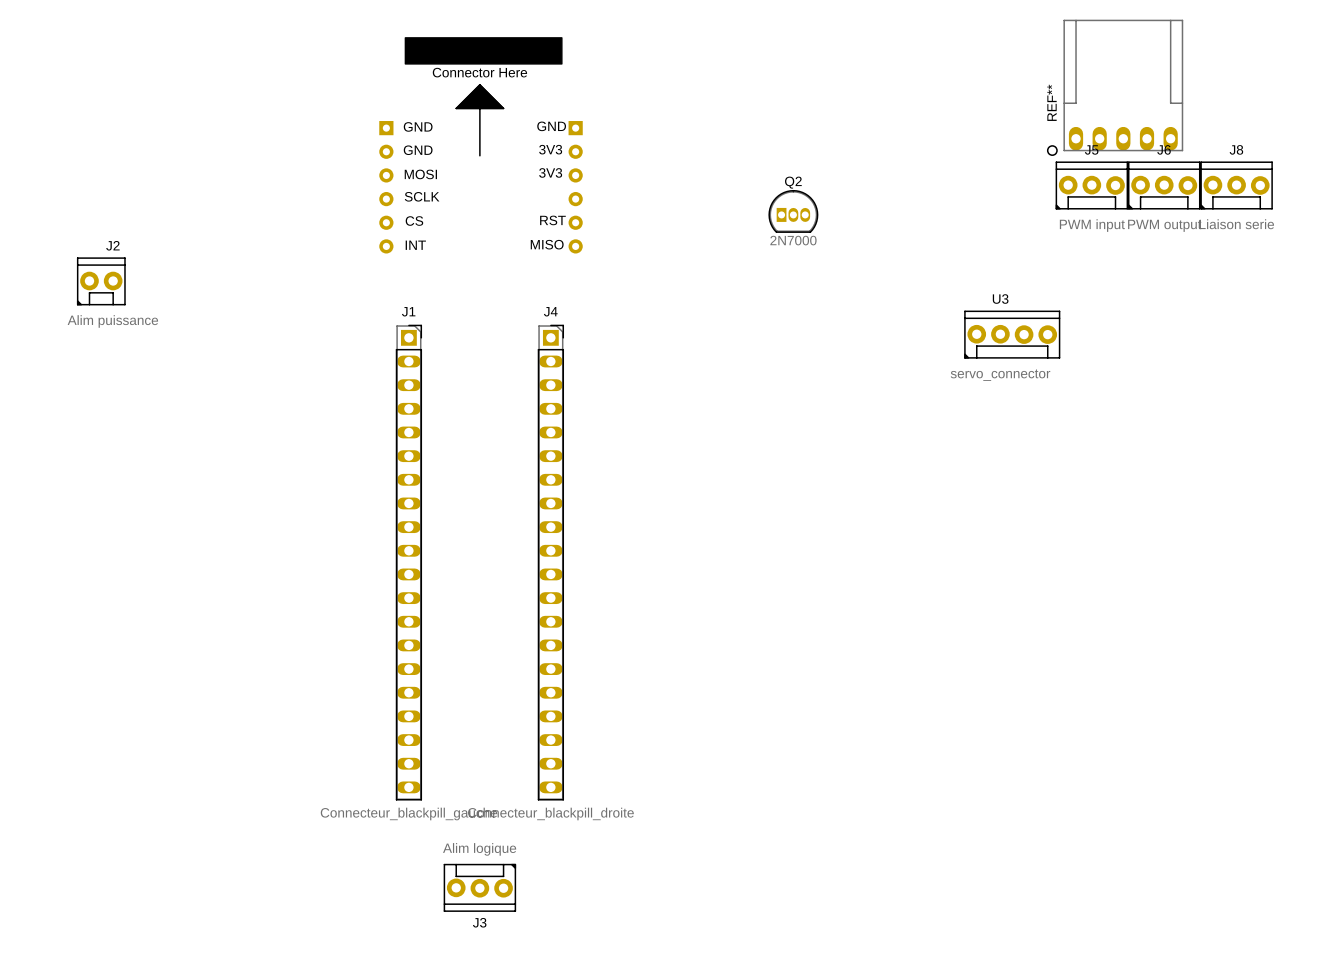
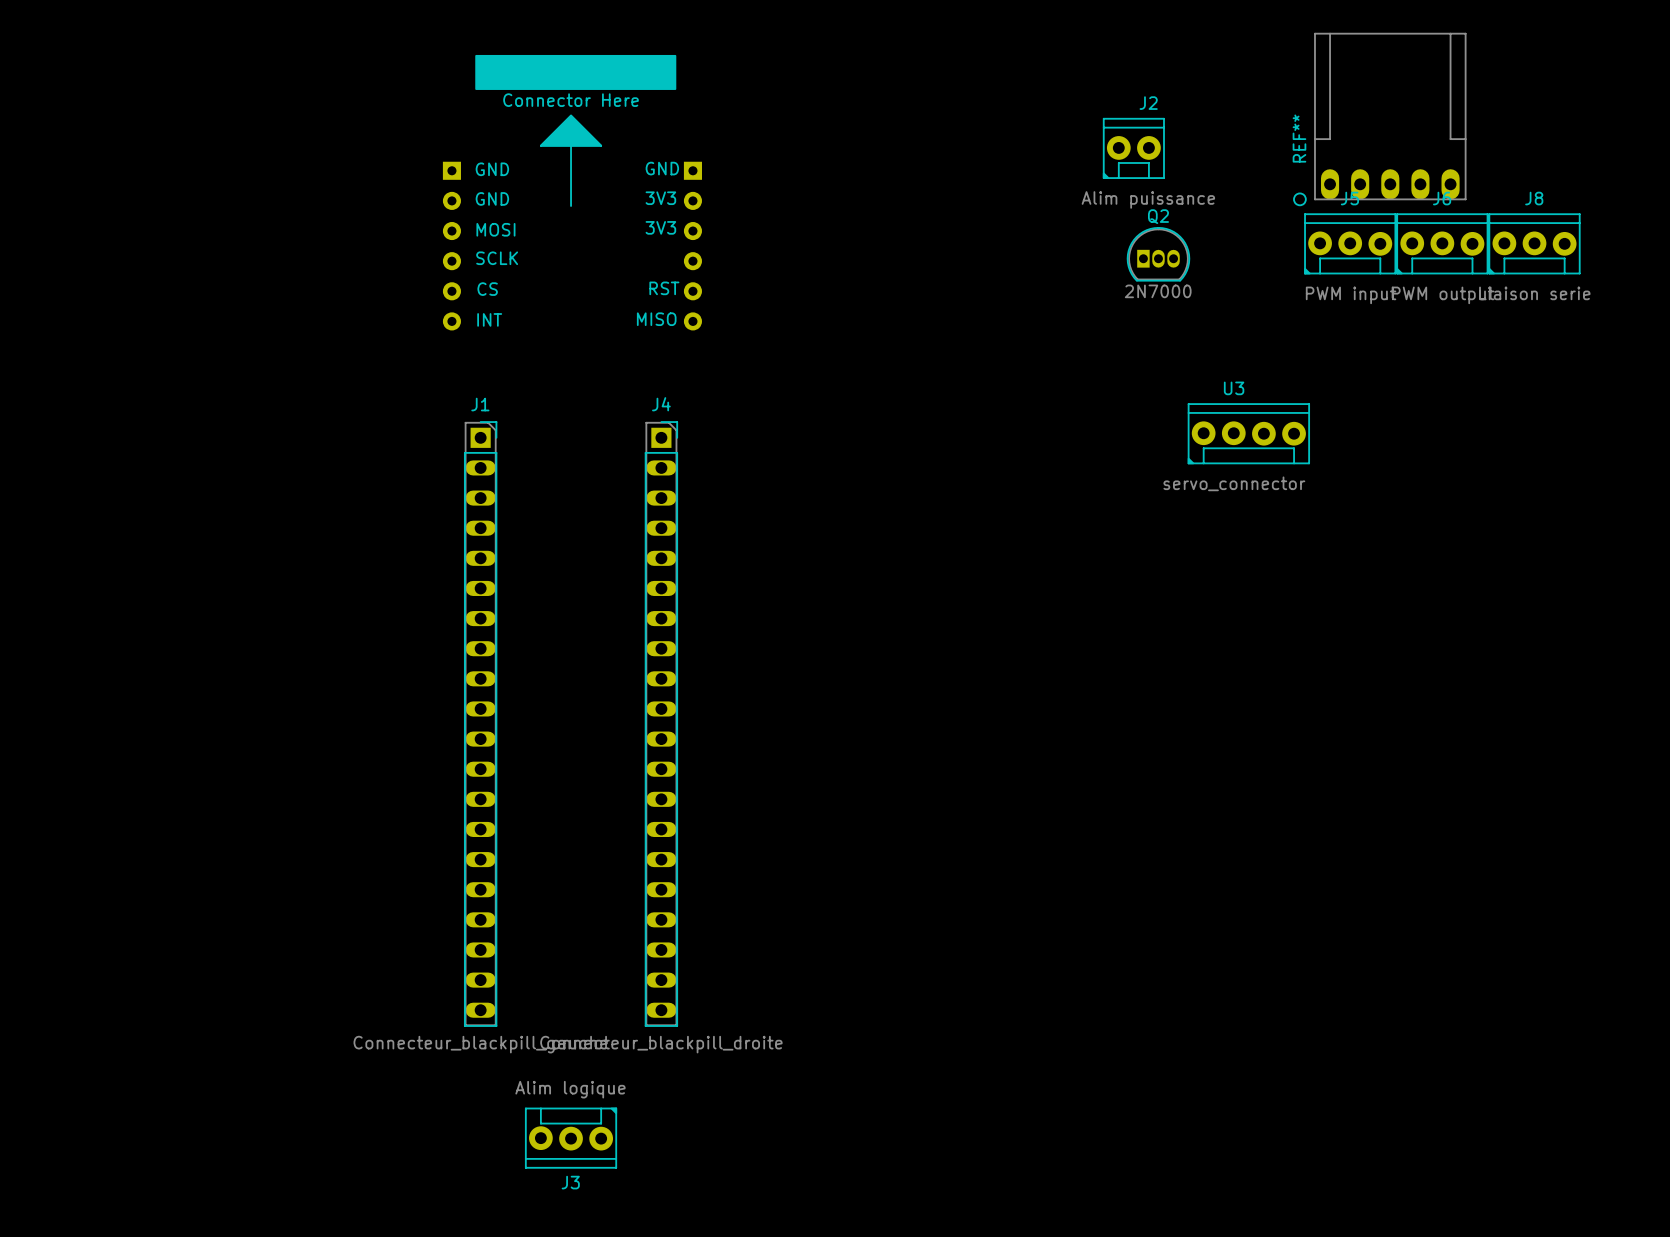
Q2 position: (793, 211) -> (1158, 254)
J2 position: (101, 281) -> (1133, 148)

